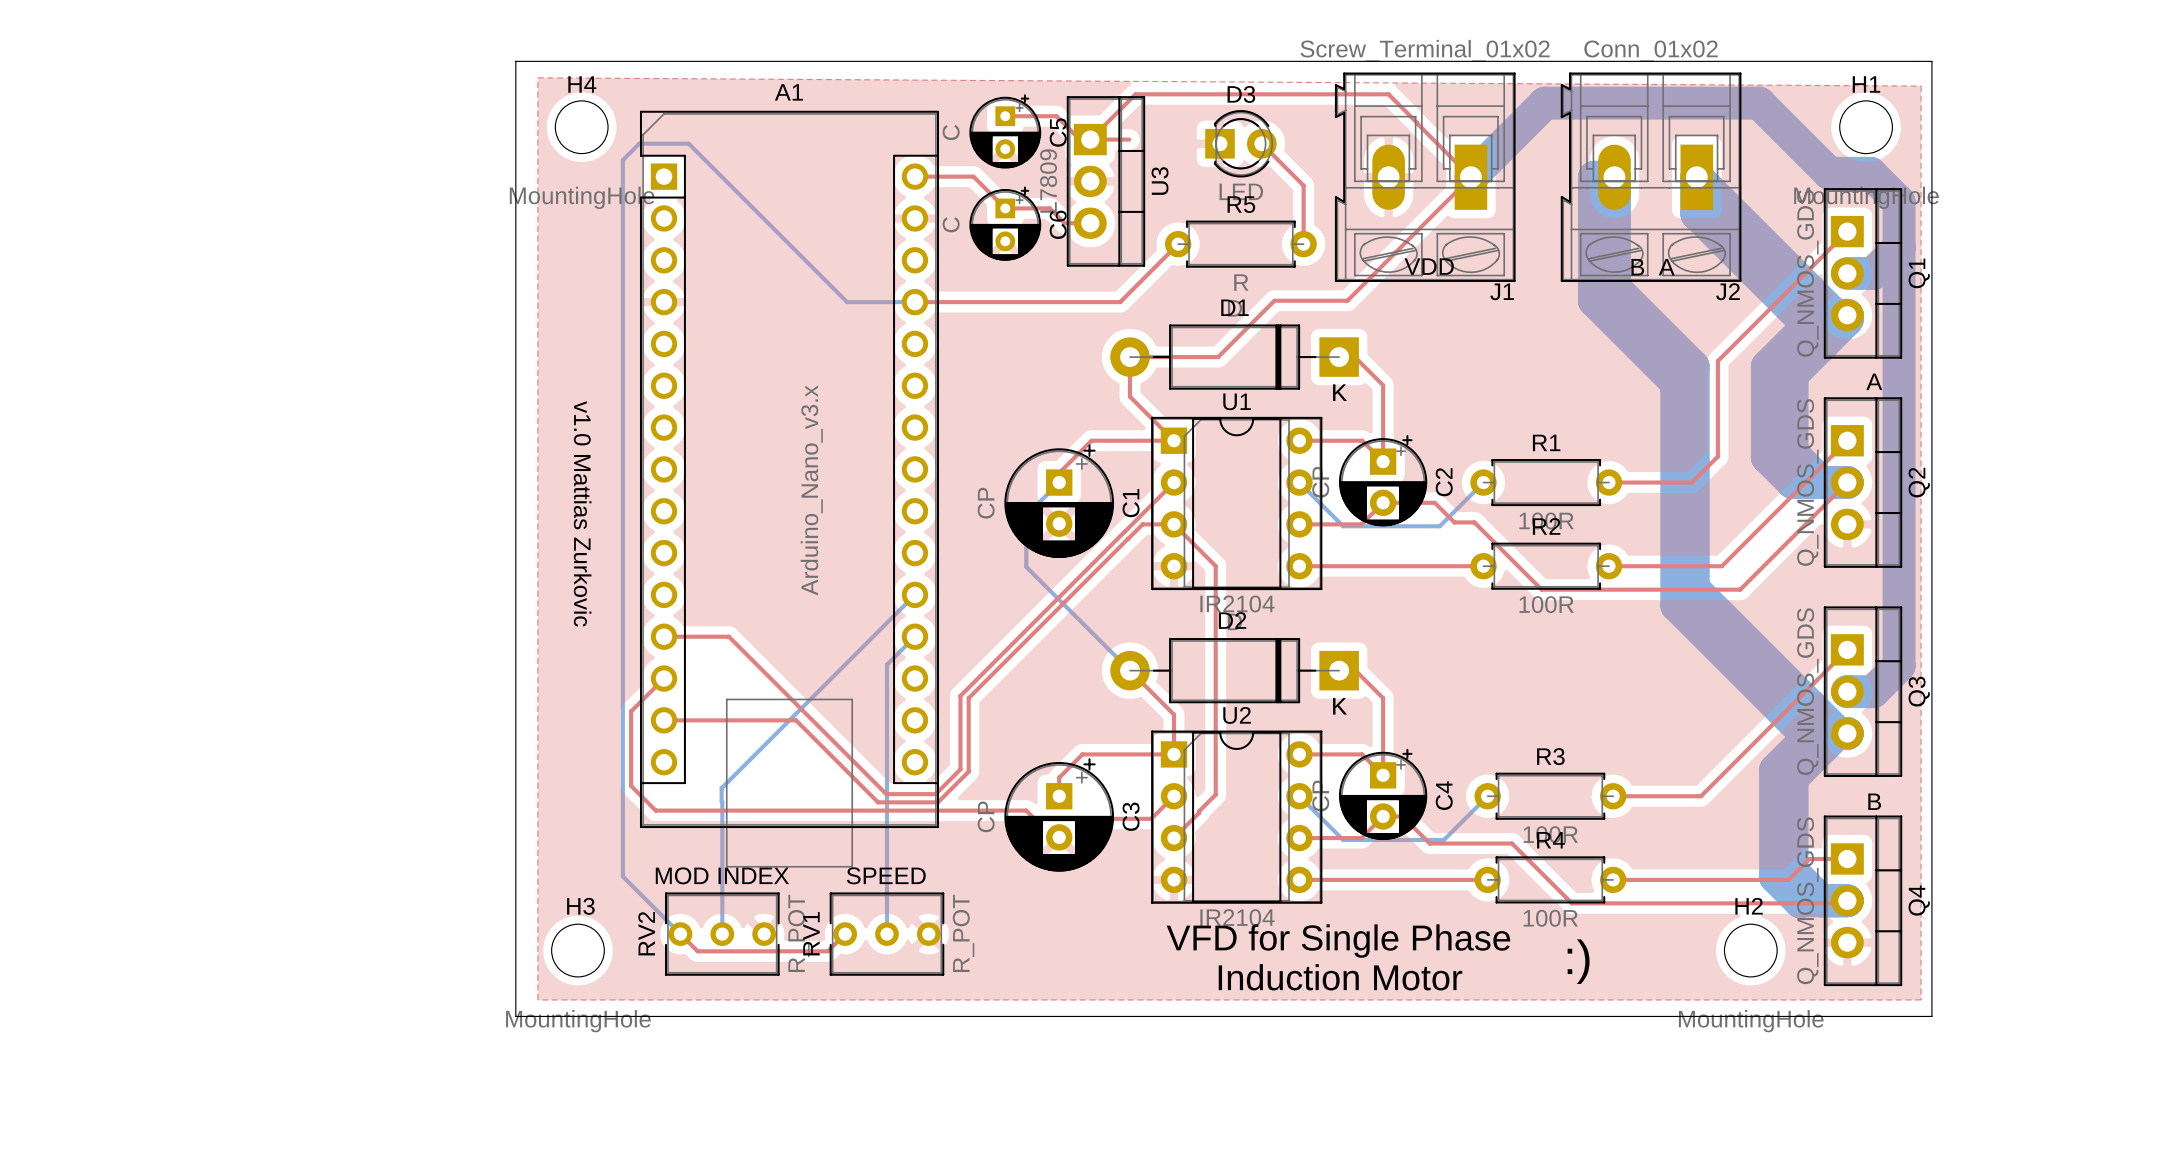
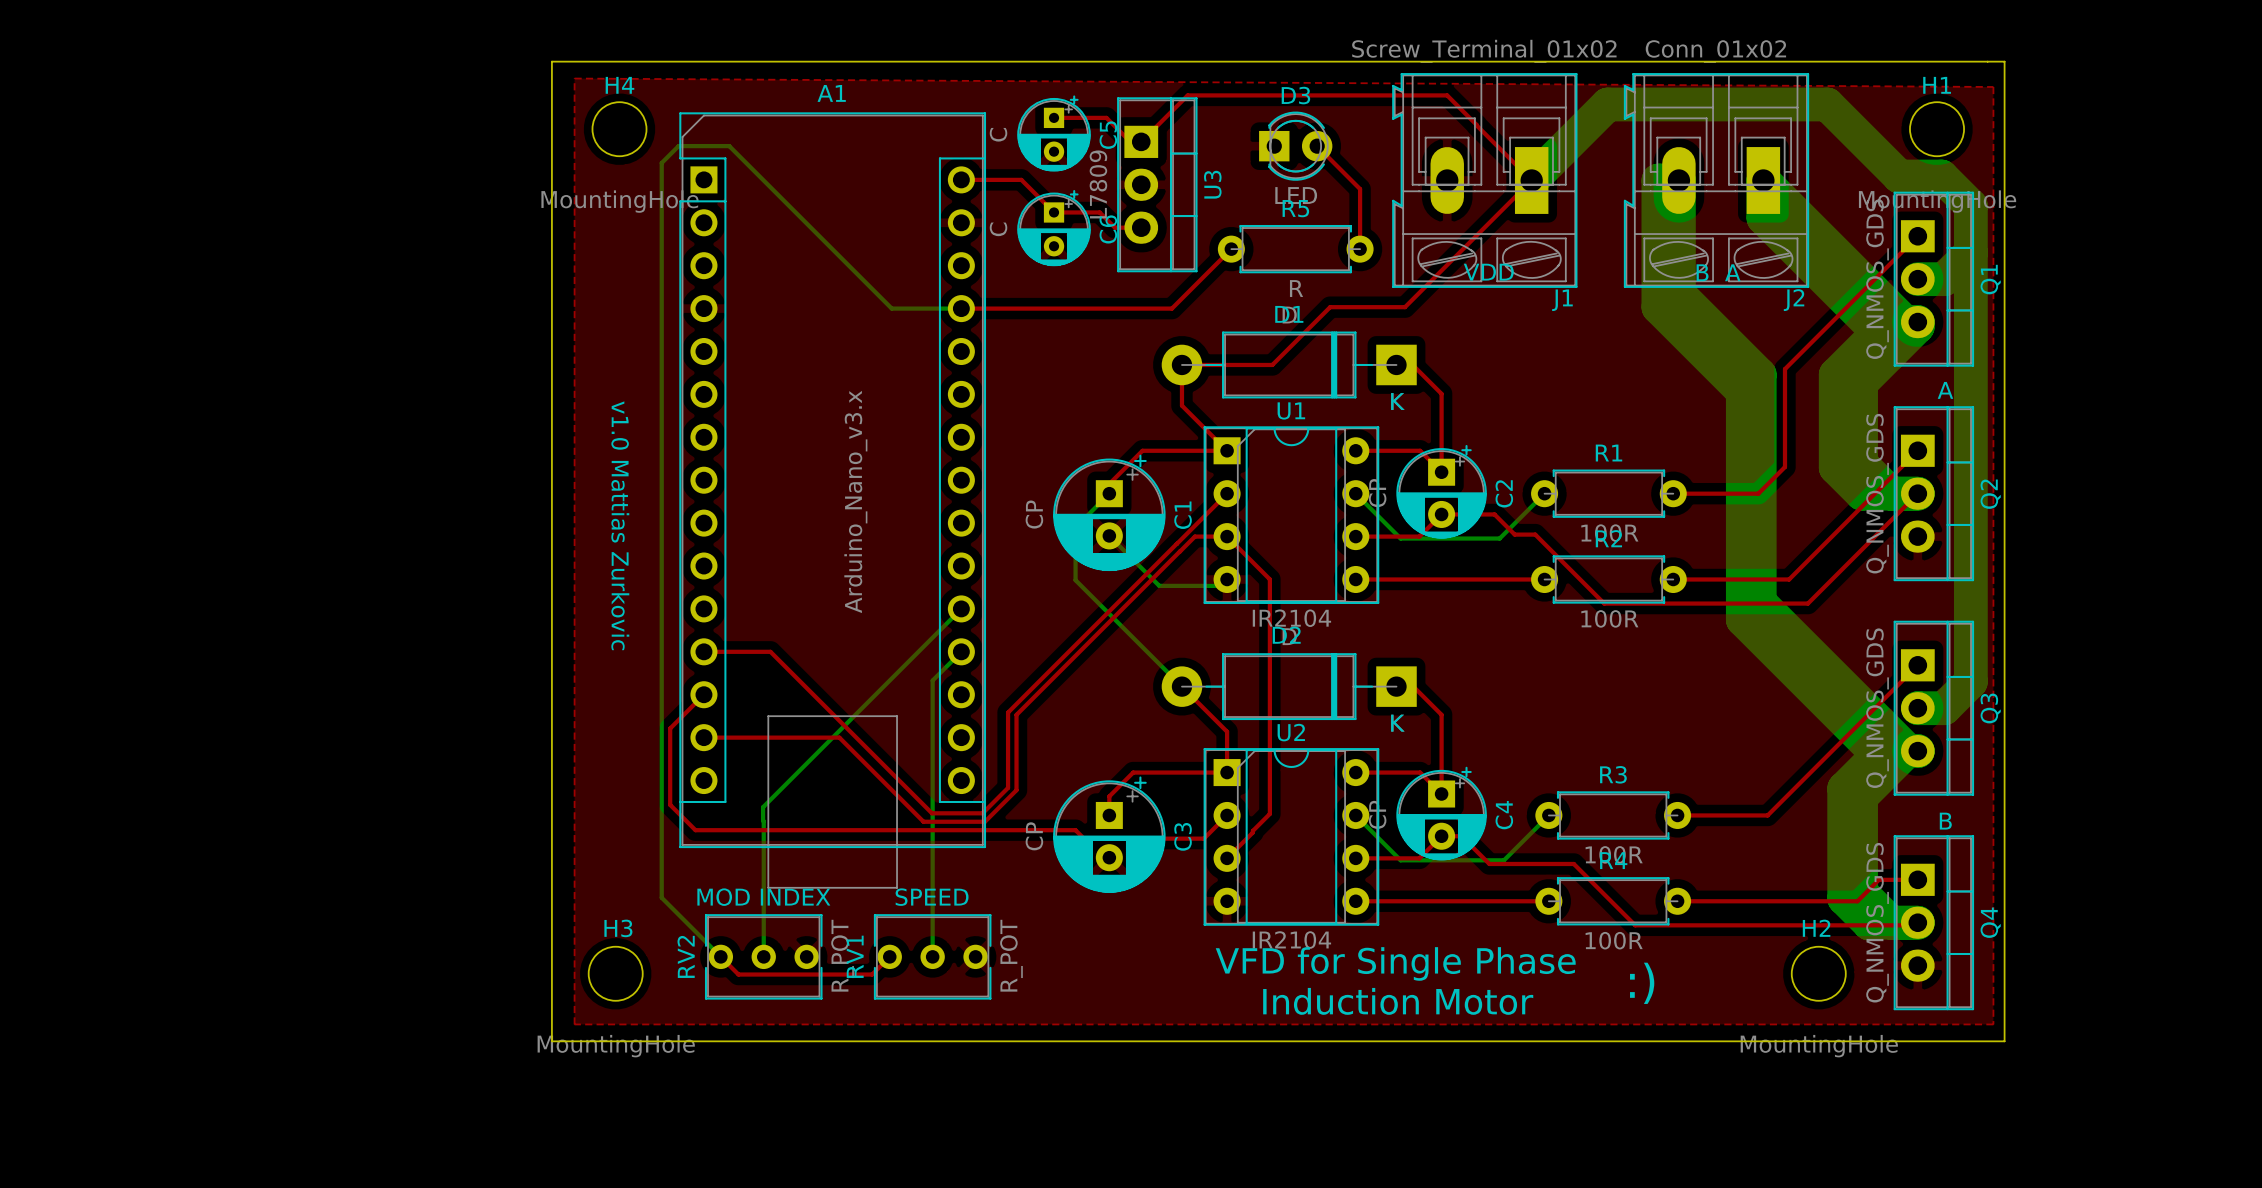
top track: (1090, 139) (1129, 139) -> none
bottom track: none -> (1109, 535) (1159, 585) (1220, 585) (1227, 579)

